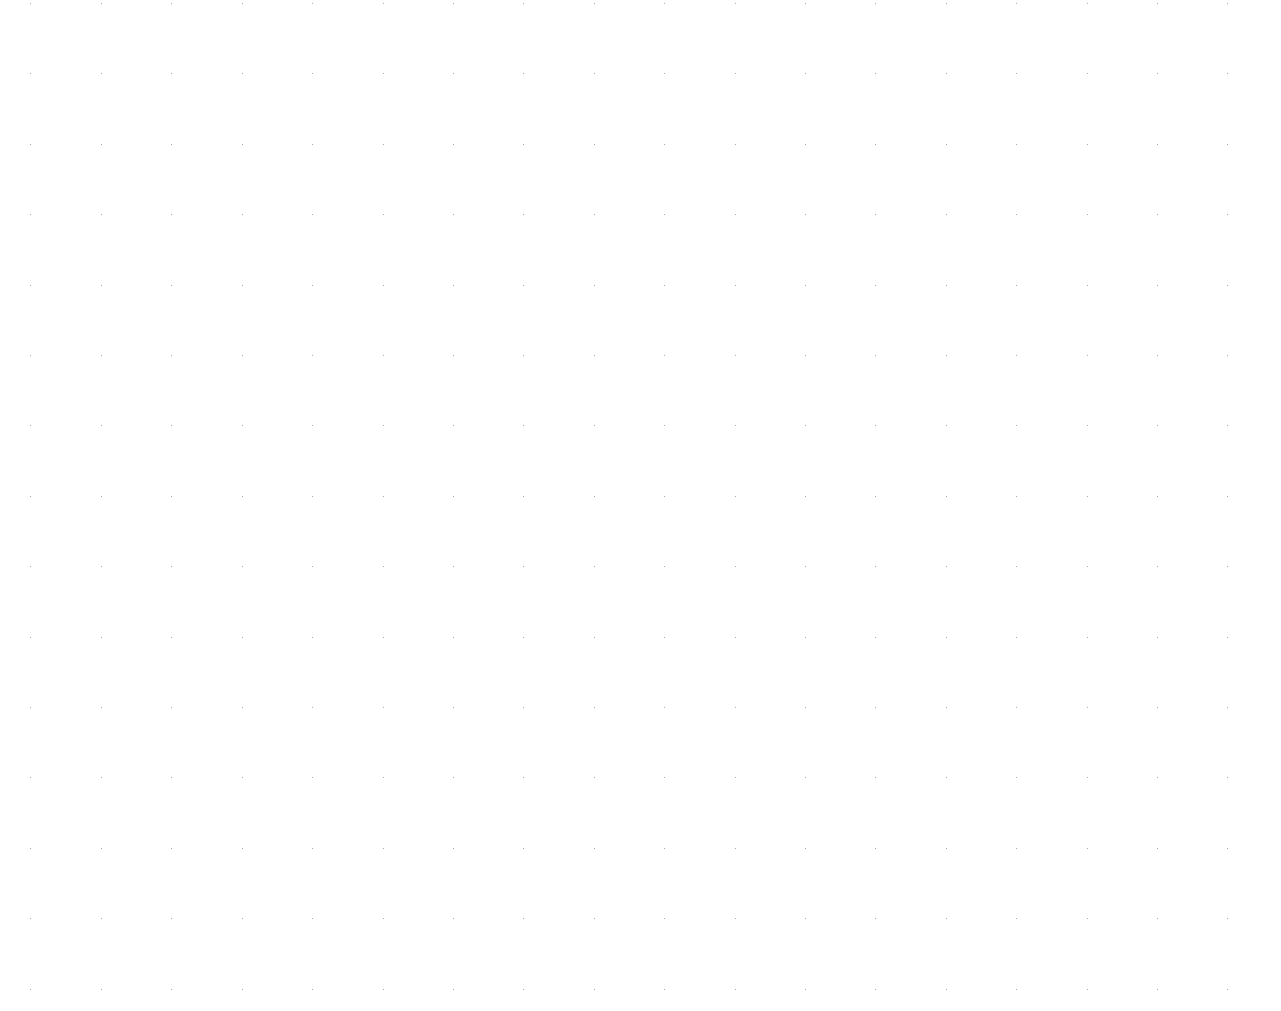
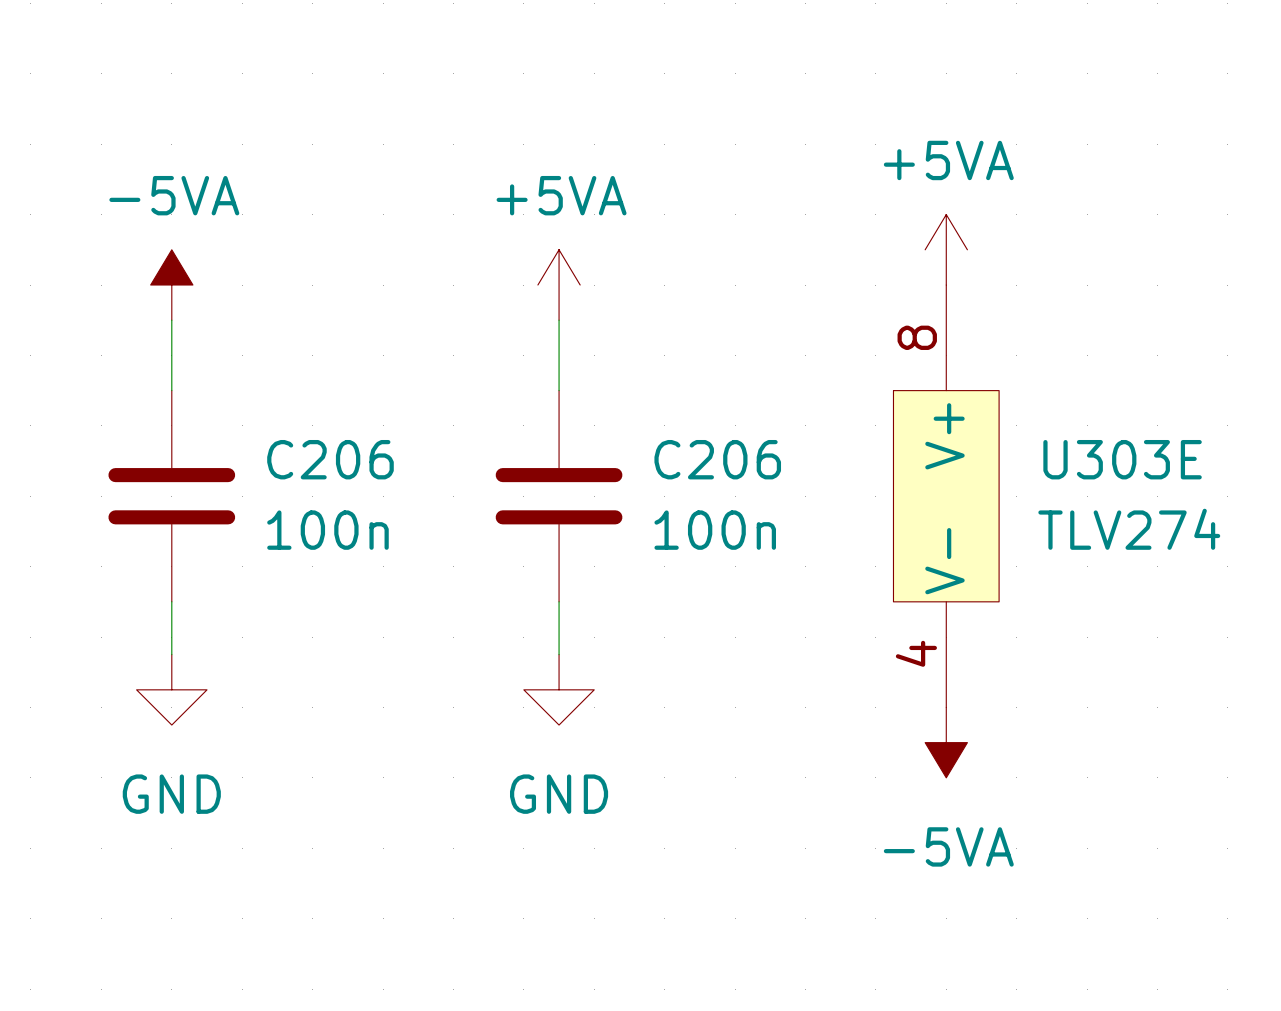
power symbol: none -> +5VA (946, 249)
power symbol: none -> -5VA (171, 285)
power symbol: none -> +5VA (559, 285)
wire: none -> (171, 320) (171, 390)
wire: none -> (559, 320) (559, 390)
C206: none -> 100n (171, 496)
C206: none -> 100n (559, 496)
U303E: none -> TLV274 (946, 496)
wire: none -> (171, 601) (171, 654)
wire: none -> (559, 601) (559, 654)
power symbol: none -> GND (171, 689)
power symbol: none -> GND (559, 689)
power symbol: none -> -5VA (946, 742)

